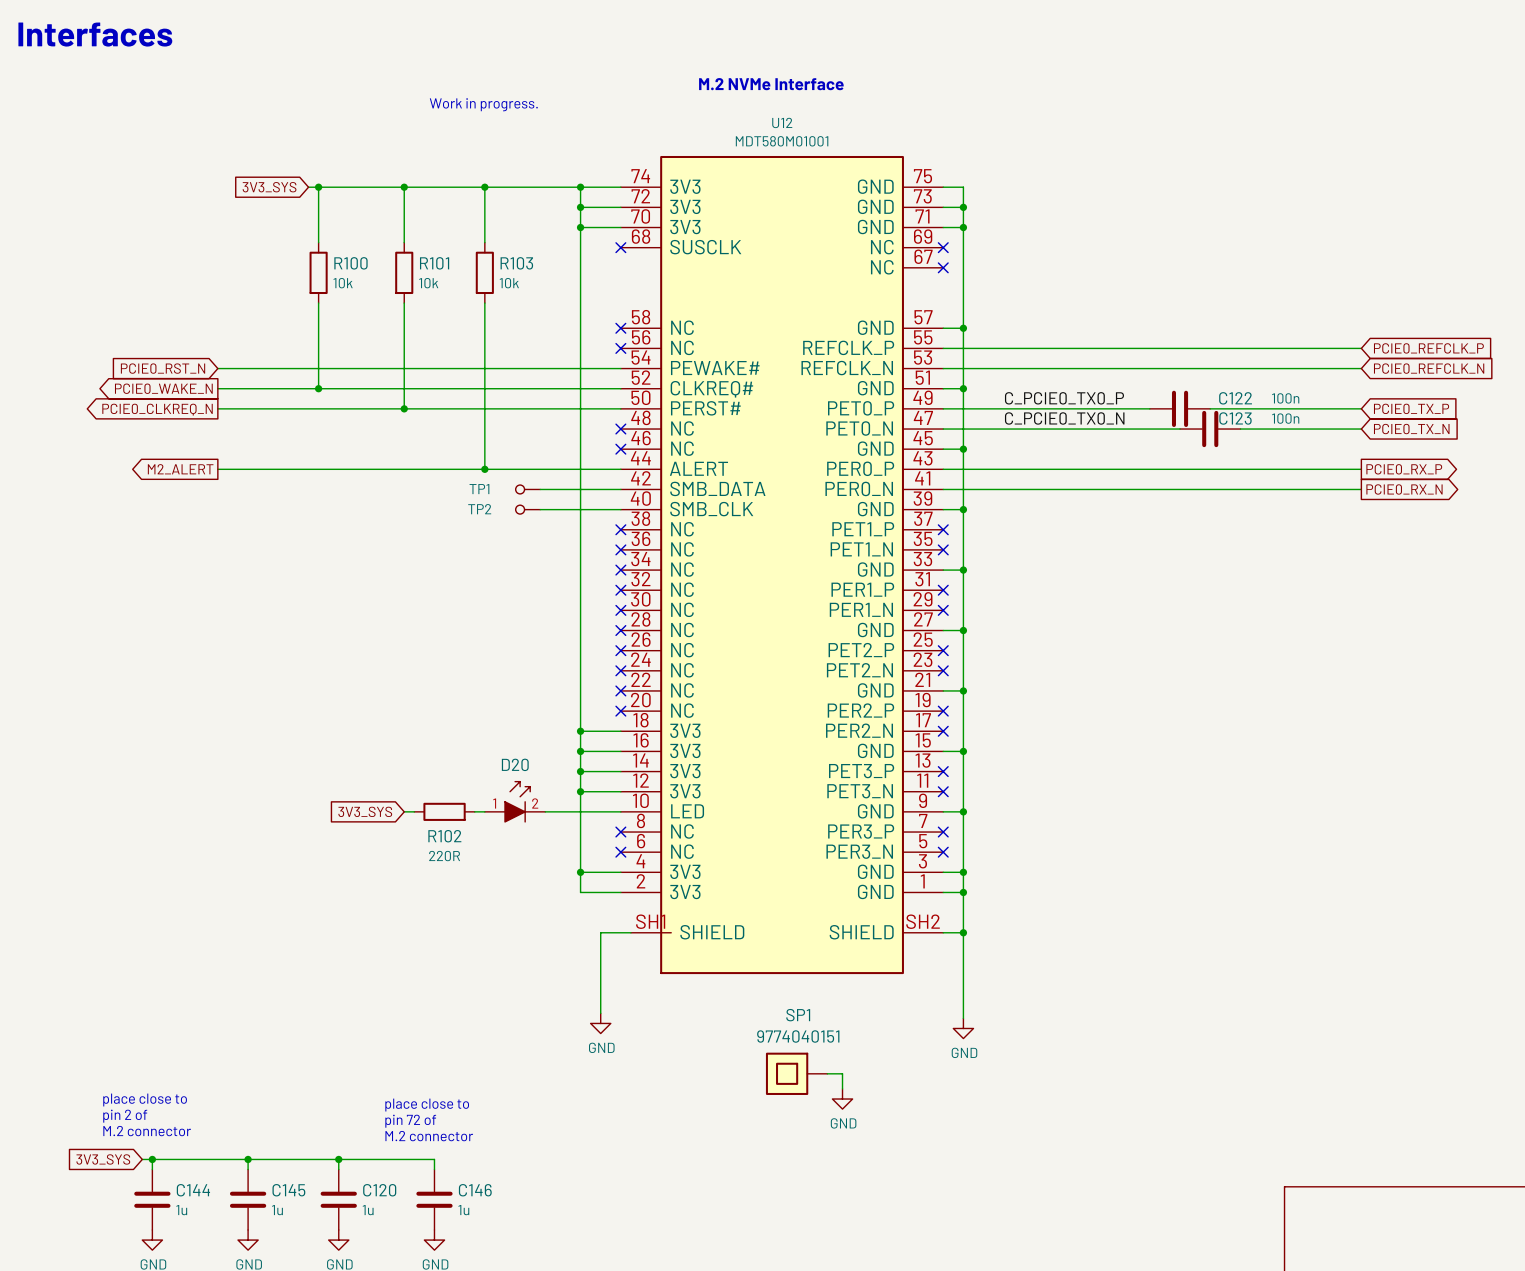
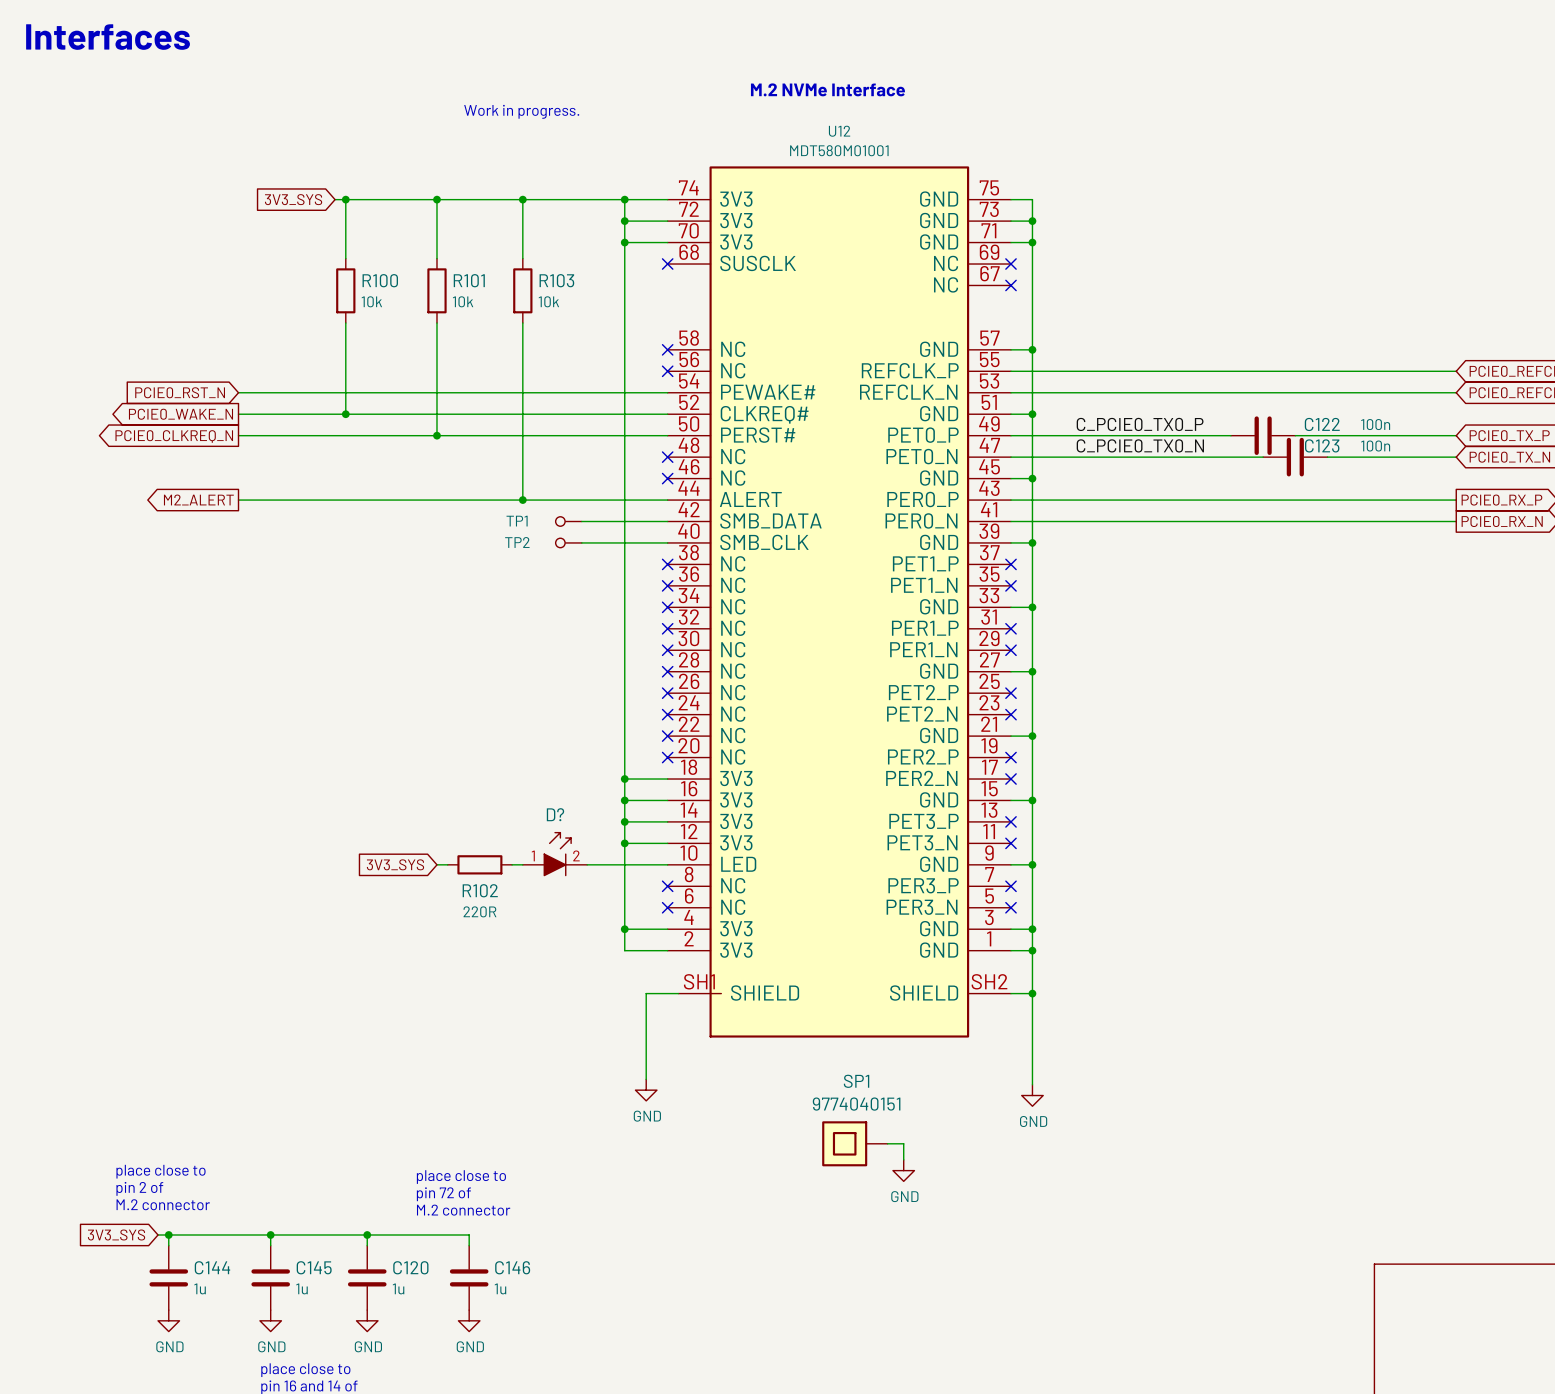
D20 name: D20 (515, 764) -> D? (555, 814)

